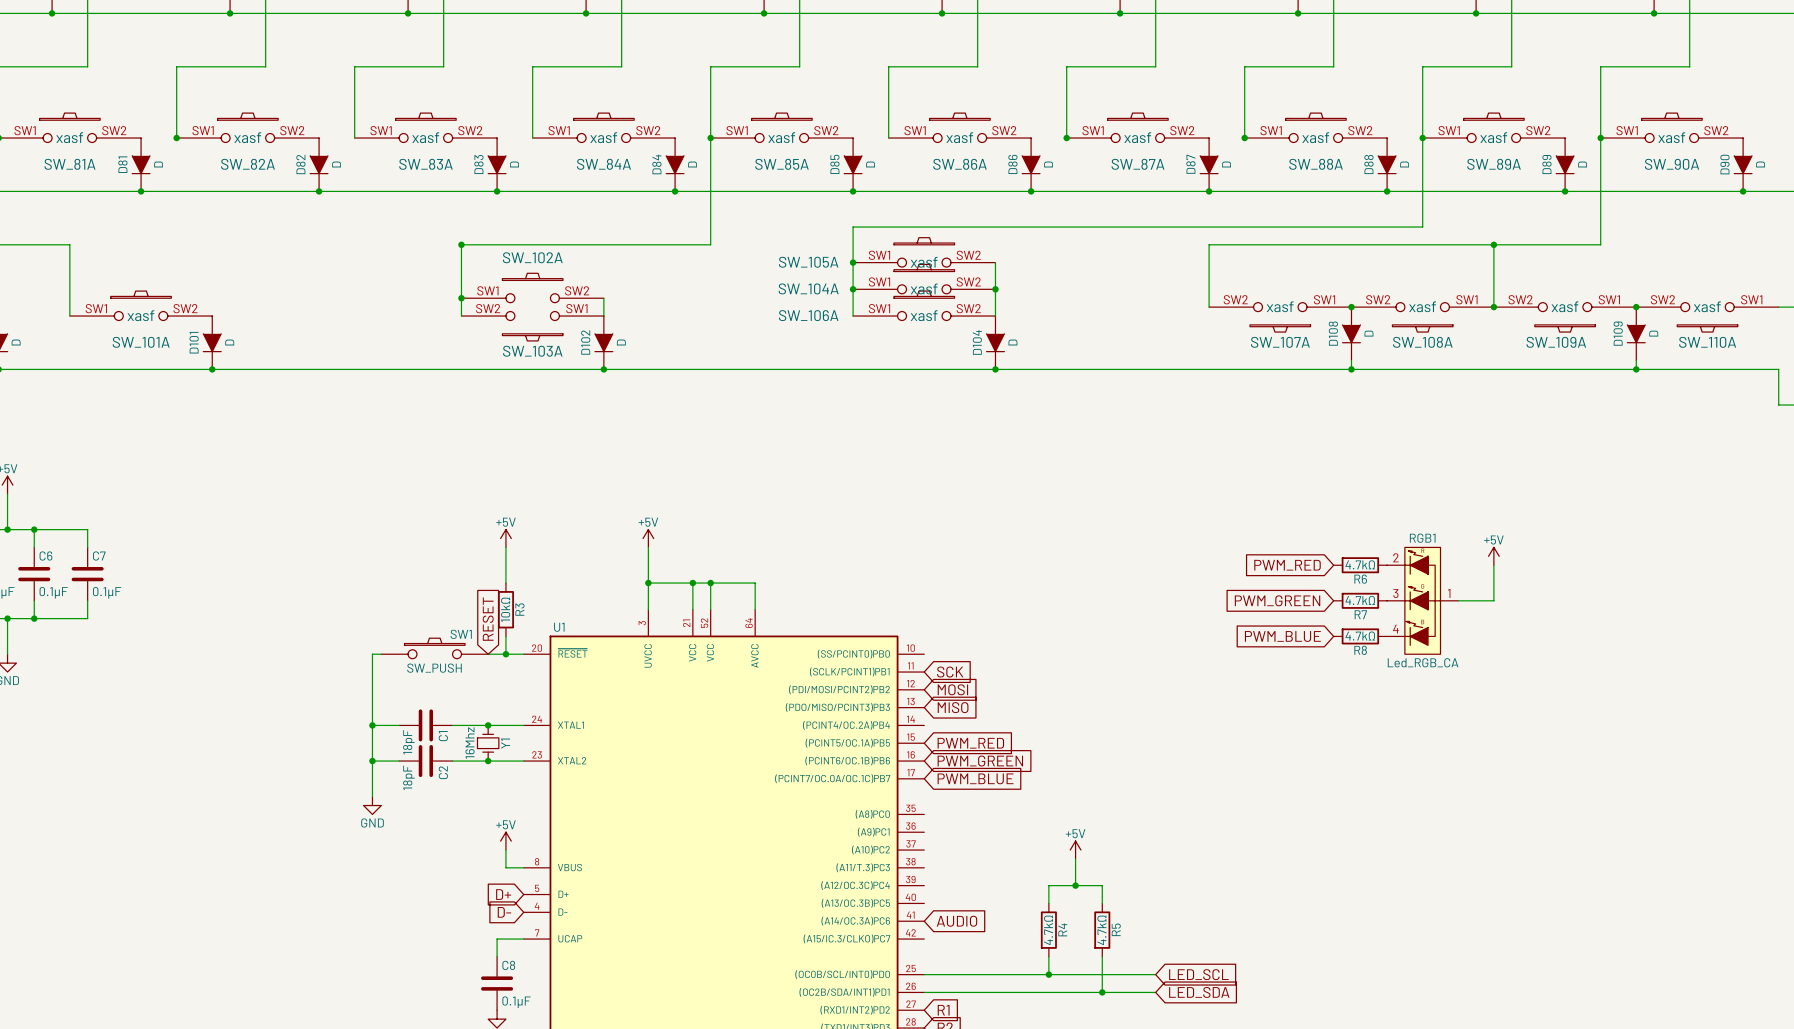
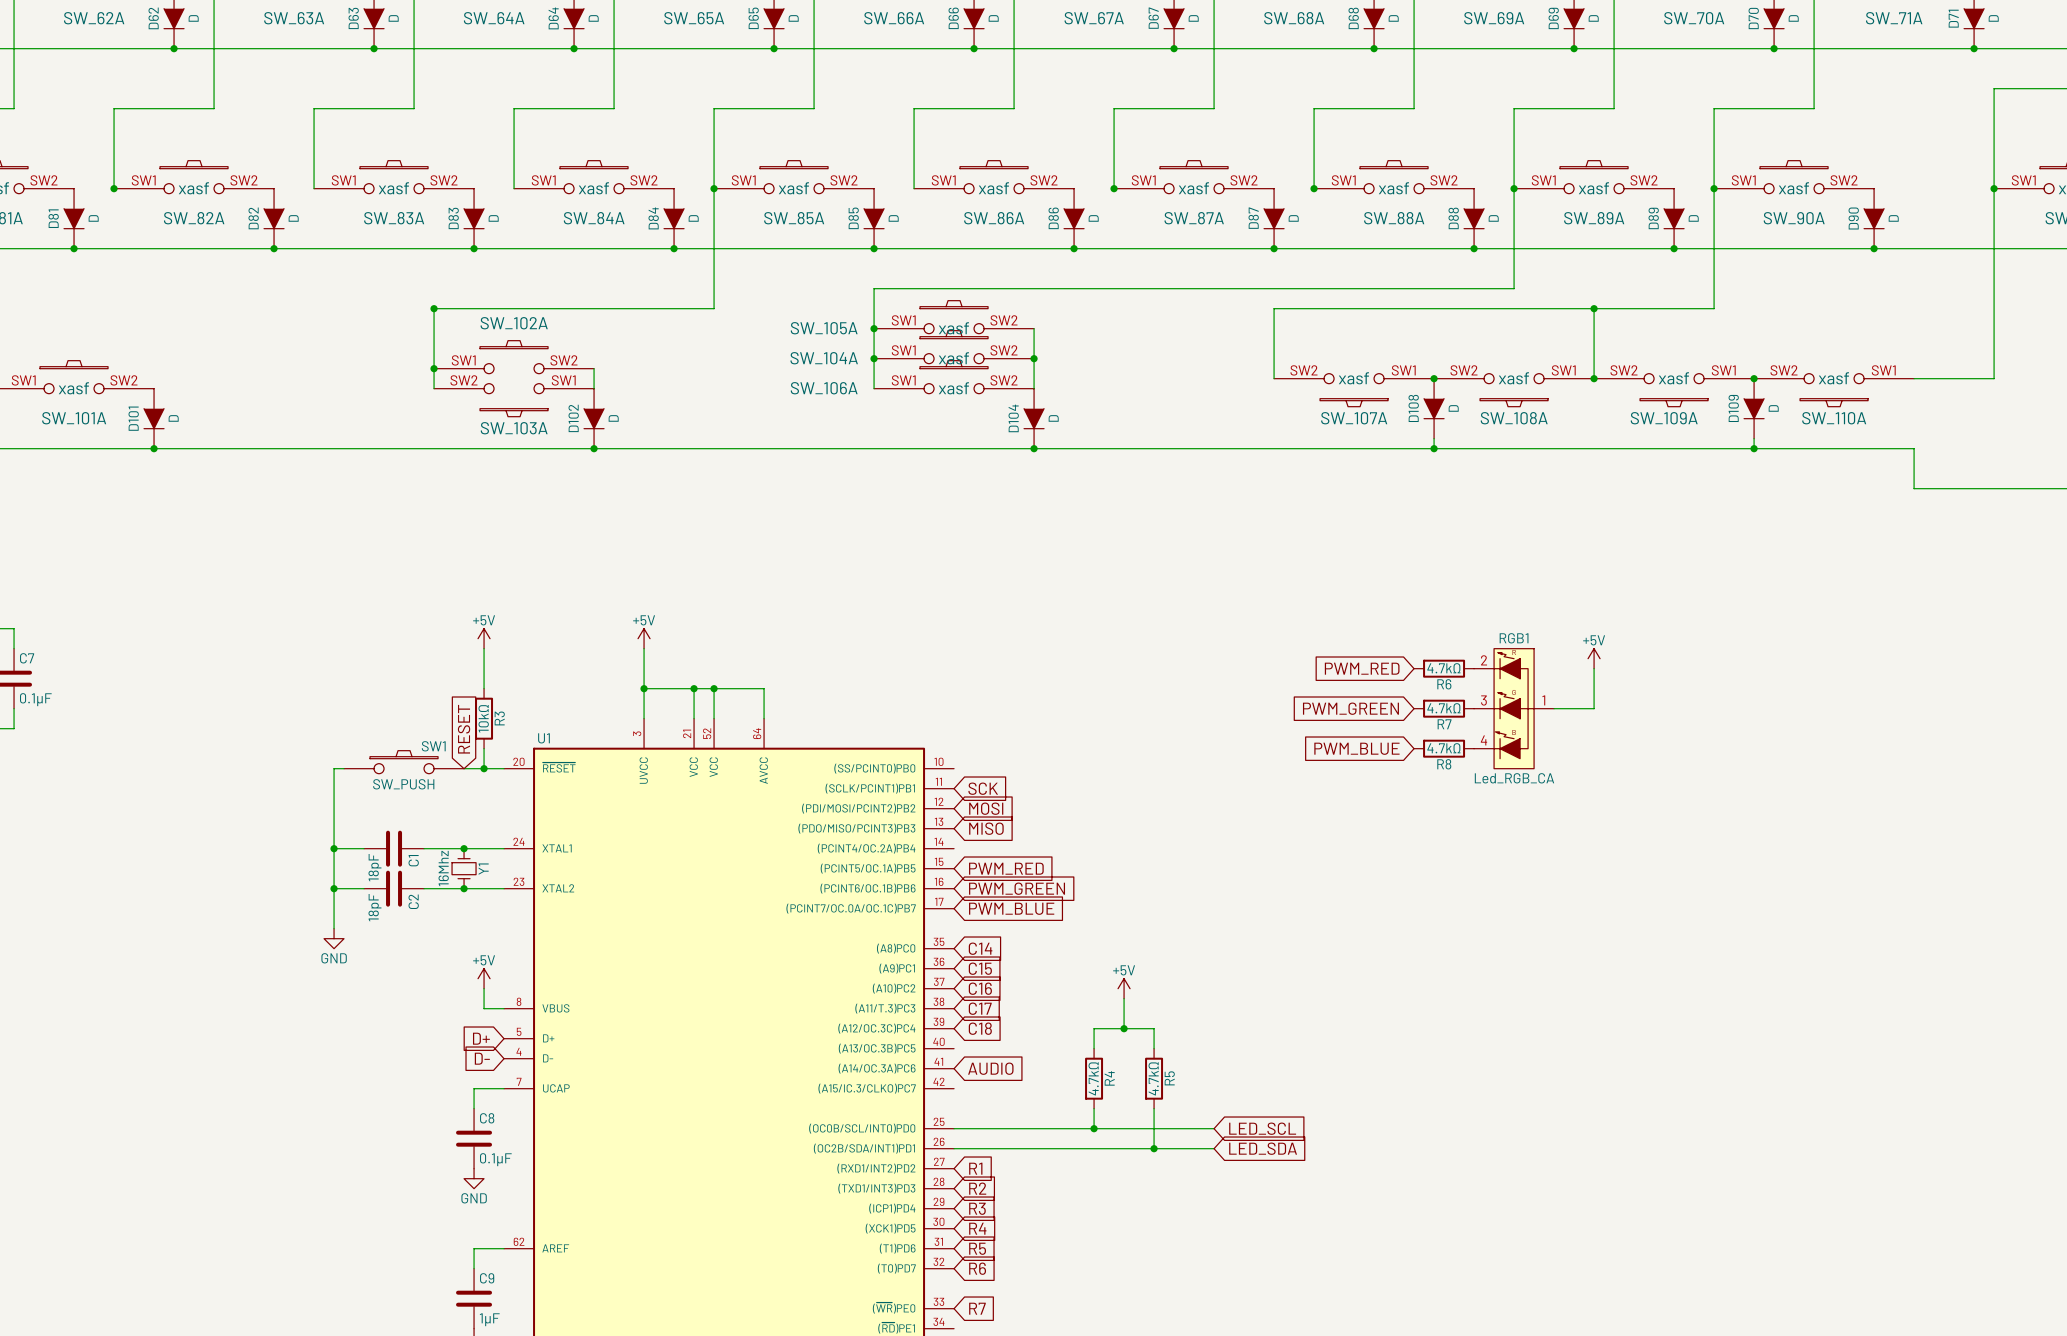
global label: none -> C14 (980, 948)
global label: none -> C15 (980, 968)
global label: none -> C16 (980, 988)
global label: none -> C17 (980, 1008)
global label: none -> C18 (980, 1028)

